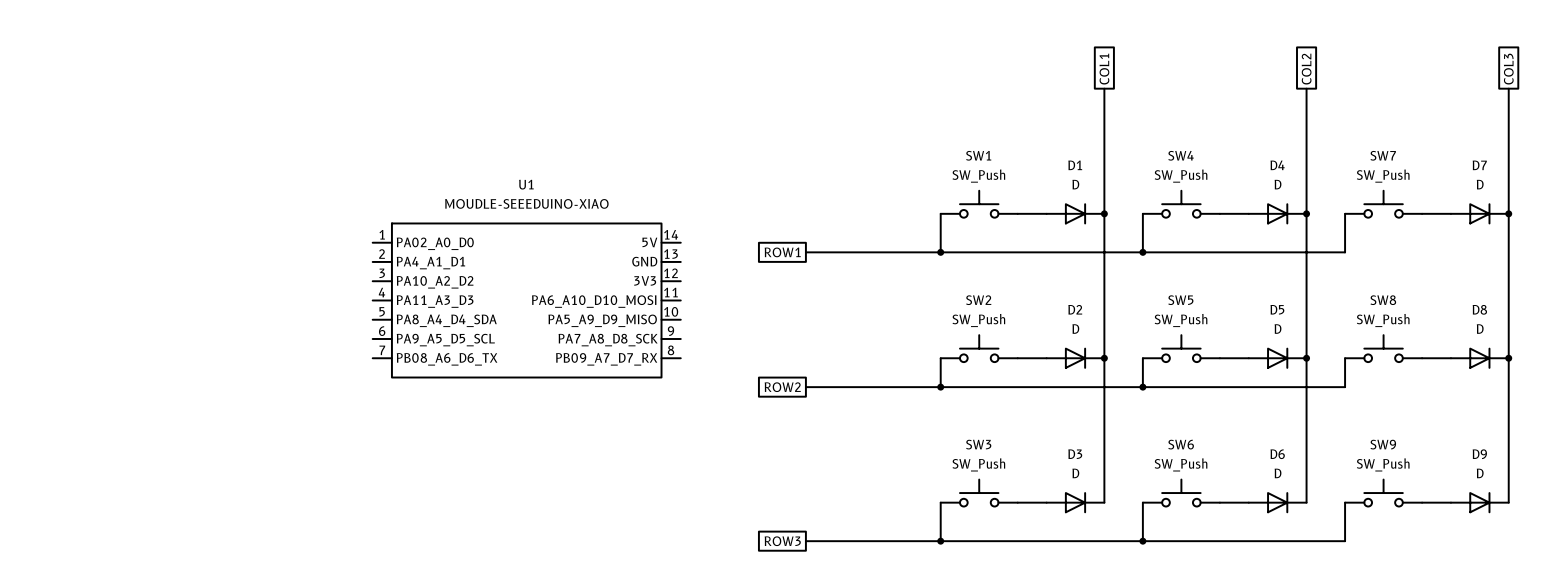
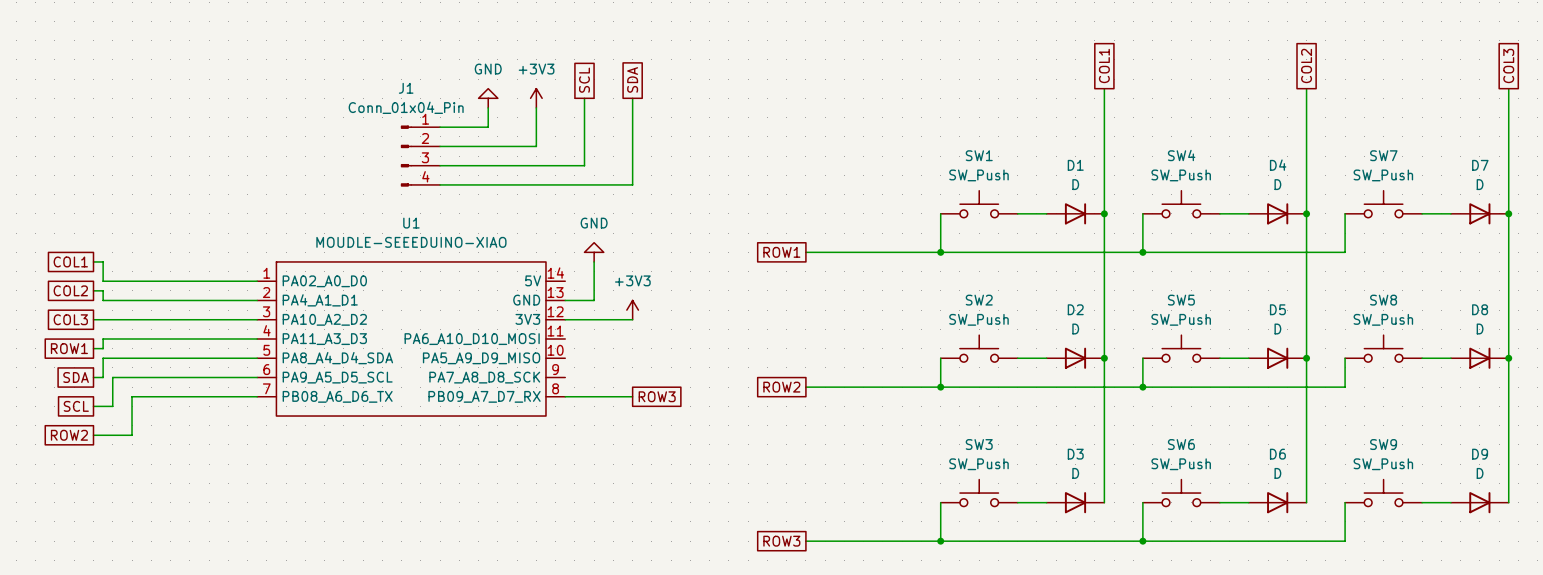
global label: none -> SDA (632, 79)
global label: none -> SCL (584, 80)
power symbol: none -> GND (488, 98)
power symbol: none -> +3V3 (536, 98)
wire: none -> (584, 98) (584, 165) (440, 165)
wire: none -> (632, 98) (632, 184) (440, 184)
wire: none -> (488, 107) (488, 127) (440, 127)
wire: none -> (536, 107) (536, 146) (440, 146)
J1: none -> Conn_01x04_Pin (420, 156)
power symbol: none -> GND (594, 252)
wire: none -> (93, 261) (103, 261) (103, 281) (257, 281)
wire: none -> (594, 261) (594, 300) (565, 300)
global label: none -> COL1 (70, 261)
global label: none -> COL2 (70, 290)
wire: none -> (93, 290) (103, 290) (103, 300) (257, 300)
U1 position: (526, 300) -> (411, 338)
power symbol: none -> +3V3 (632, 310)
global label: none -> COL3 (70, 319)
wire: none -> (93, 319) (257, 319)
wire: none -> (565, 319) (632, 319)
wire: none -> (257, 338) (103, 338) (103, 348) (93, 348)
global label: none -> ROW1 (69, 348)
wire: none -> (257, 358) (103, 358) (103, 377) (93, 377)
global label: none -> SDA (76, 377)
wire: none -> (257, 377) (112, 377) (112, 406) (93, 406)
wire: none -> (257, 396) (132, 396) (132, 435) (93, 435)
wire: none -> (565, 396) (632, 396)
global label: none -> ROW3 (657, 396)
global label: none -> SCL (76, 406)
global label: none -> ROW2 (69, 435)

